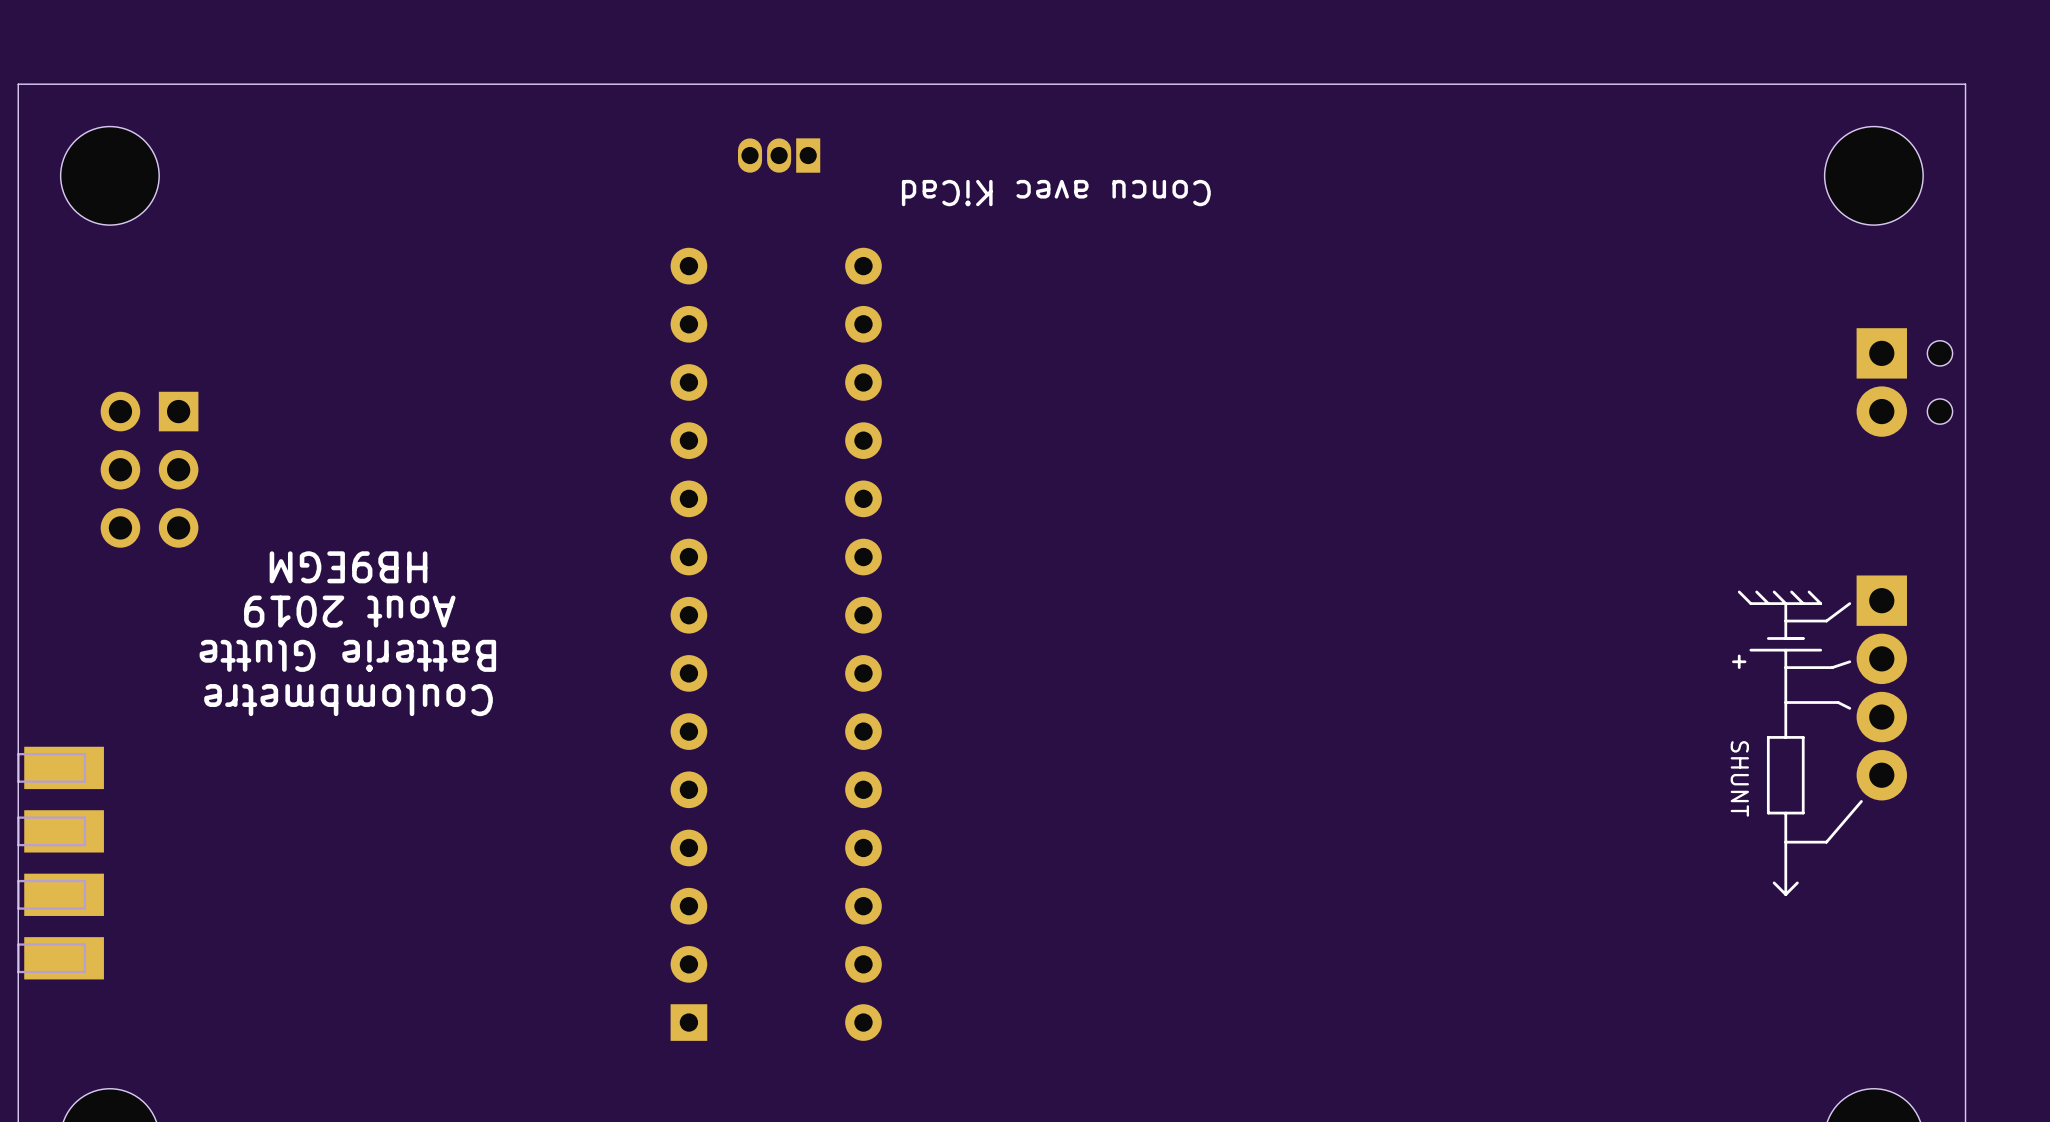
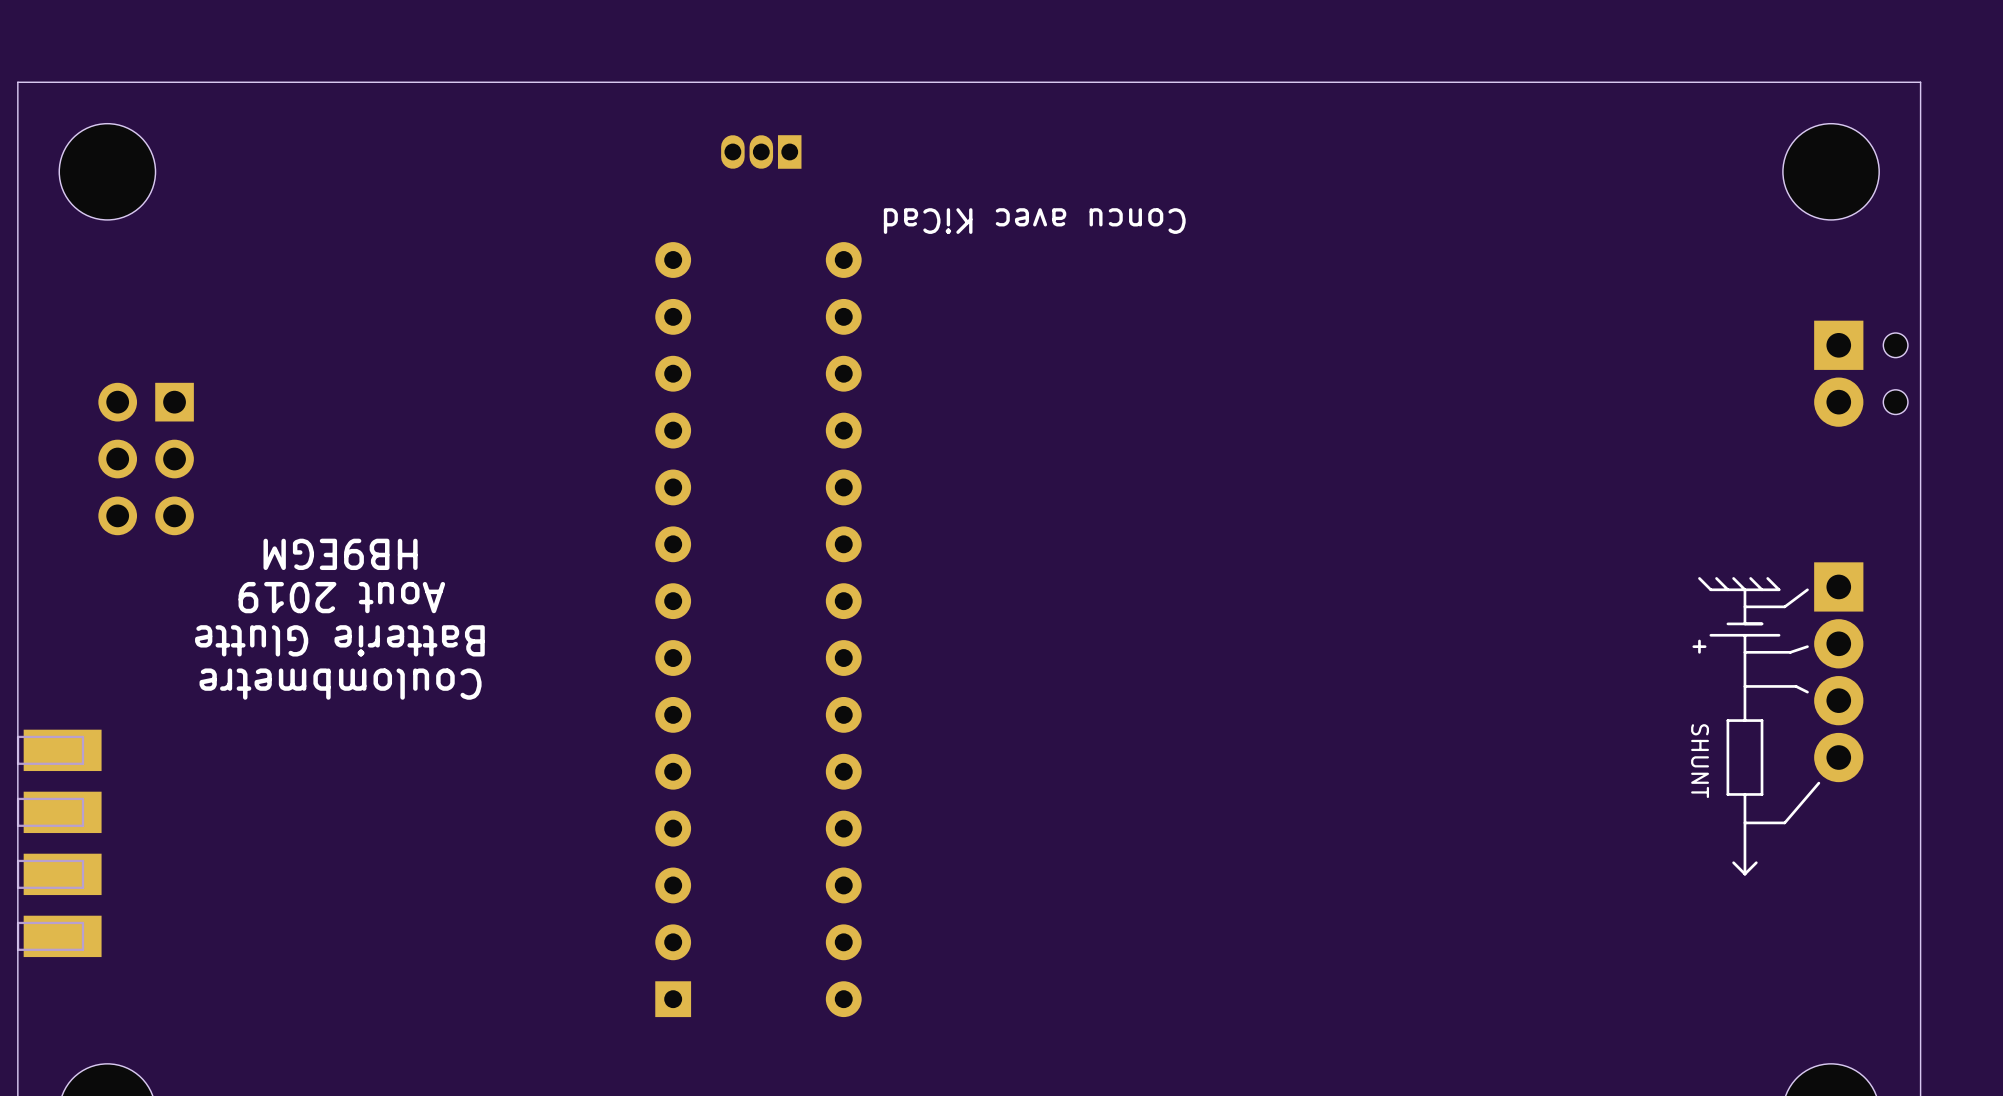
text position: Concu avec KiCad (1056, 193) -> Concu avec KiCad (1034, 221)

